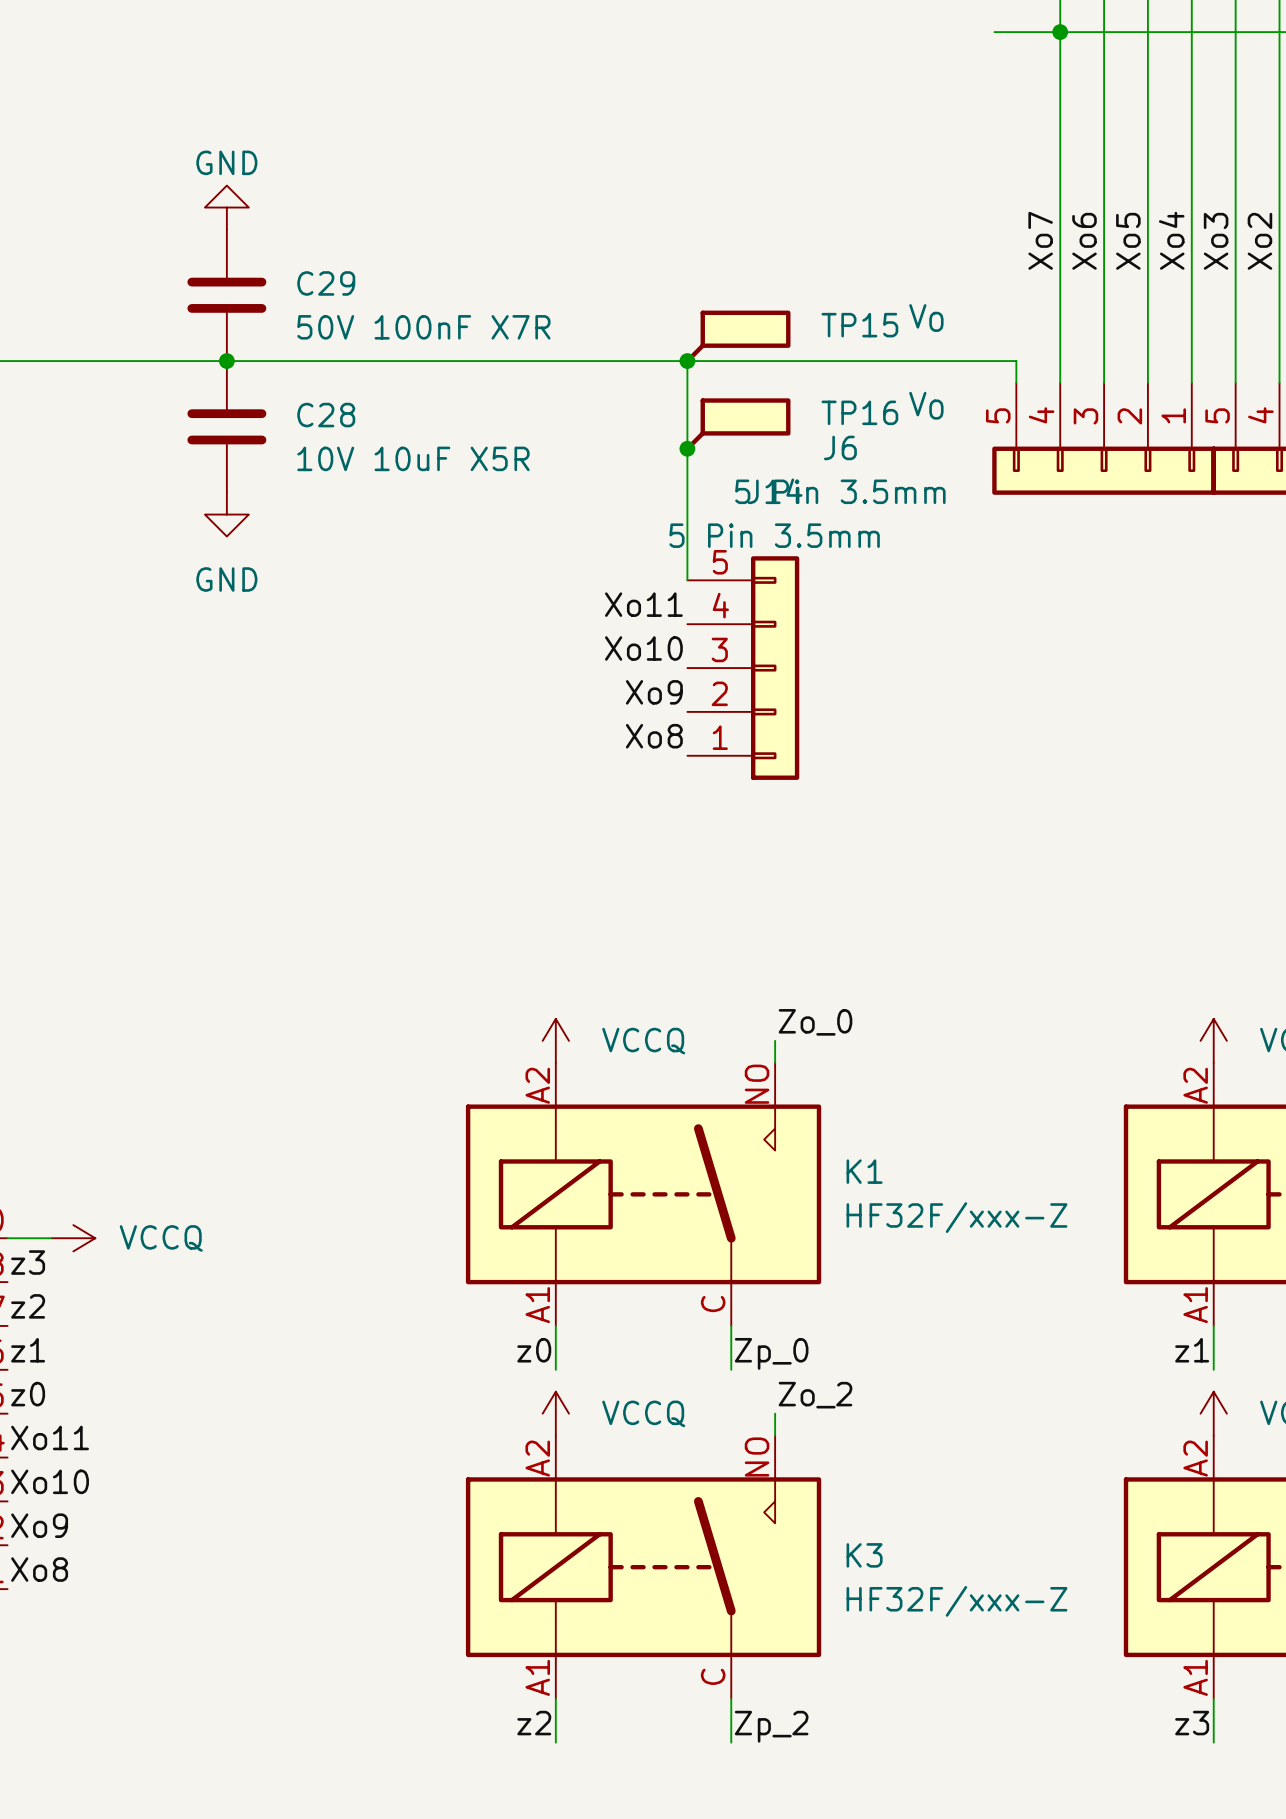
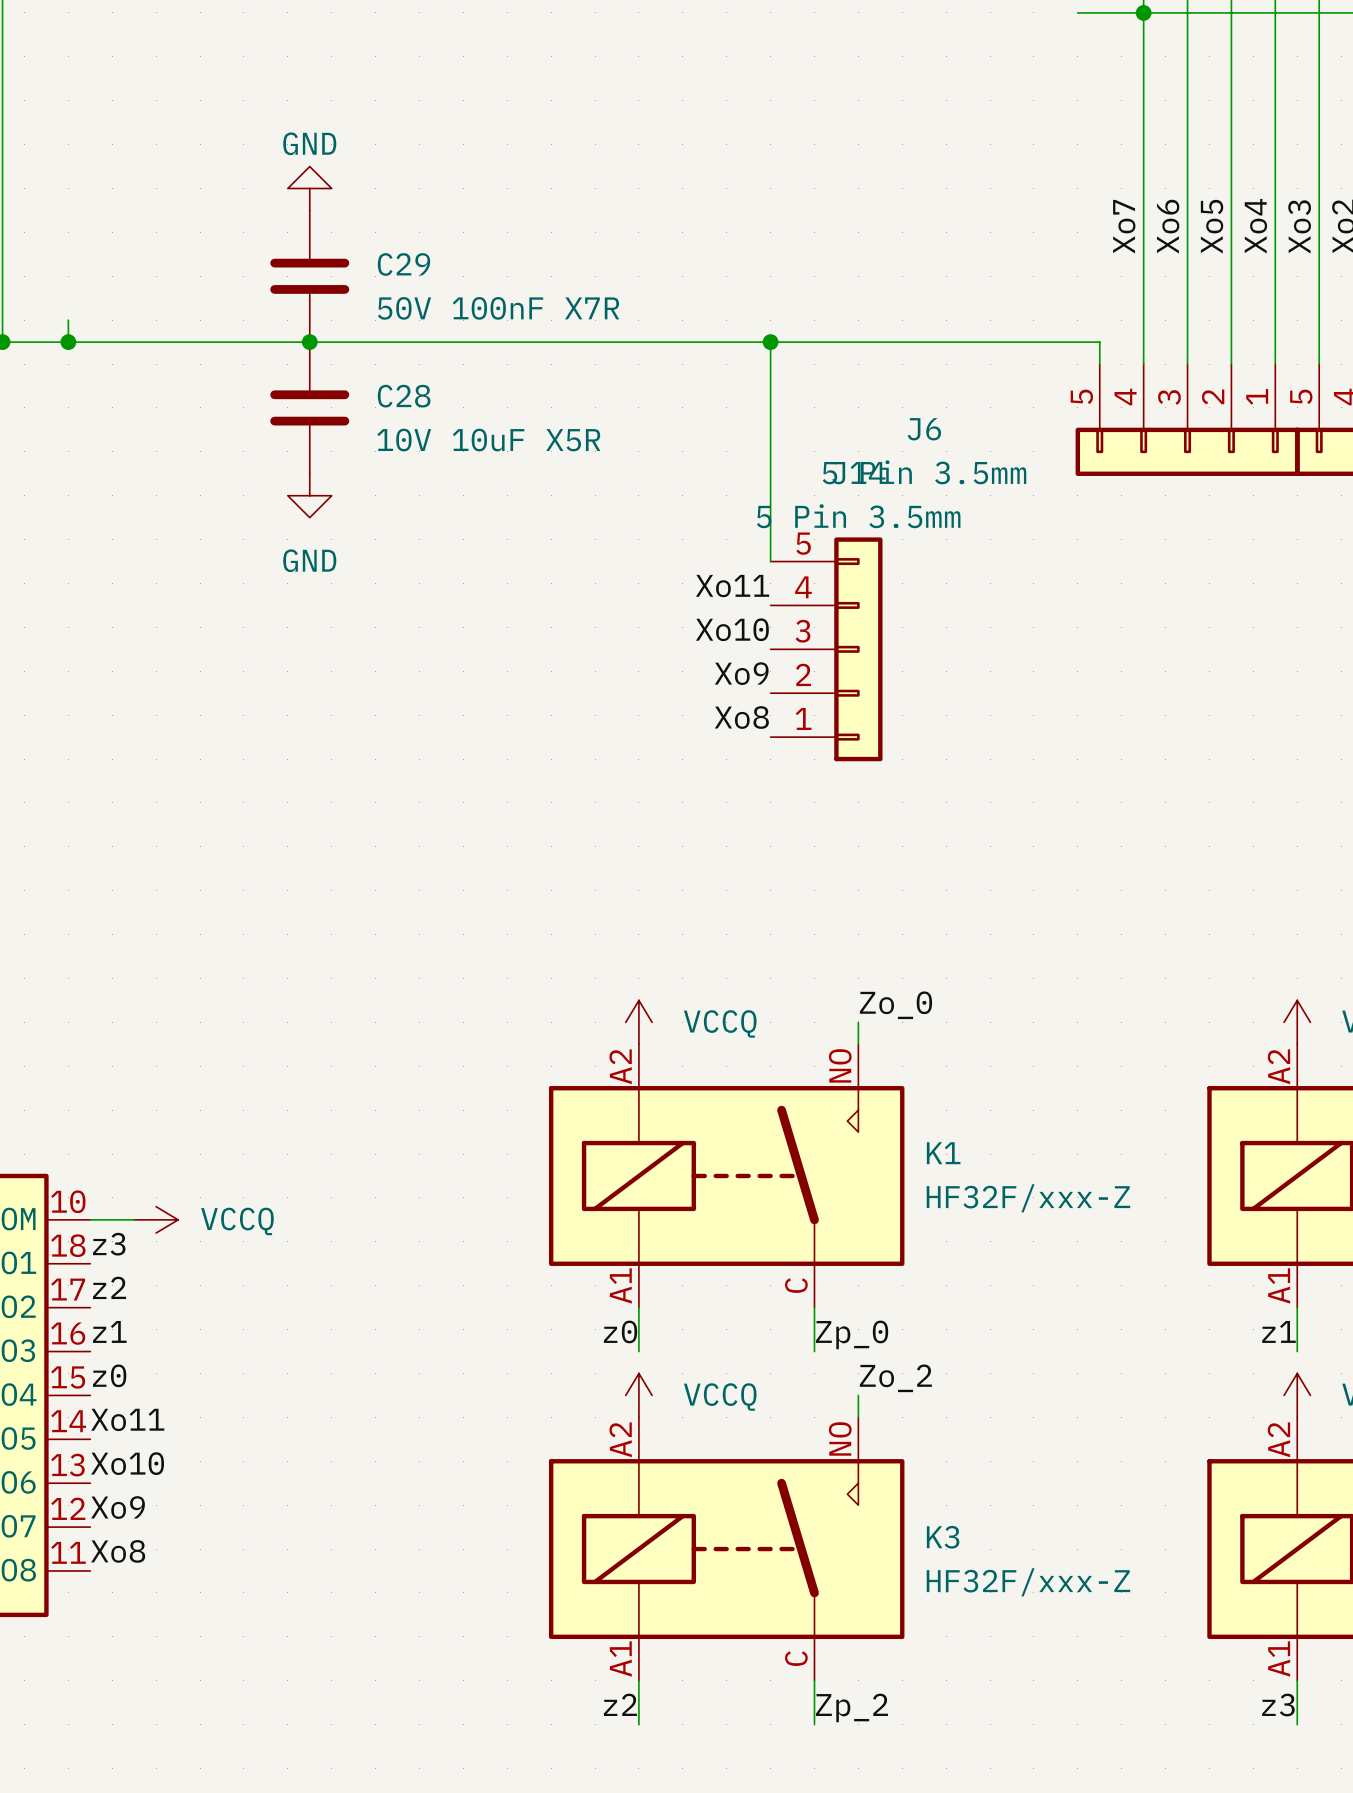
TP15: VO (737, 336) -> none
TP16: VO (737, 424) -> none
junction: (687, 448) -> none

